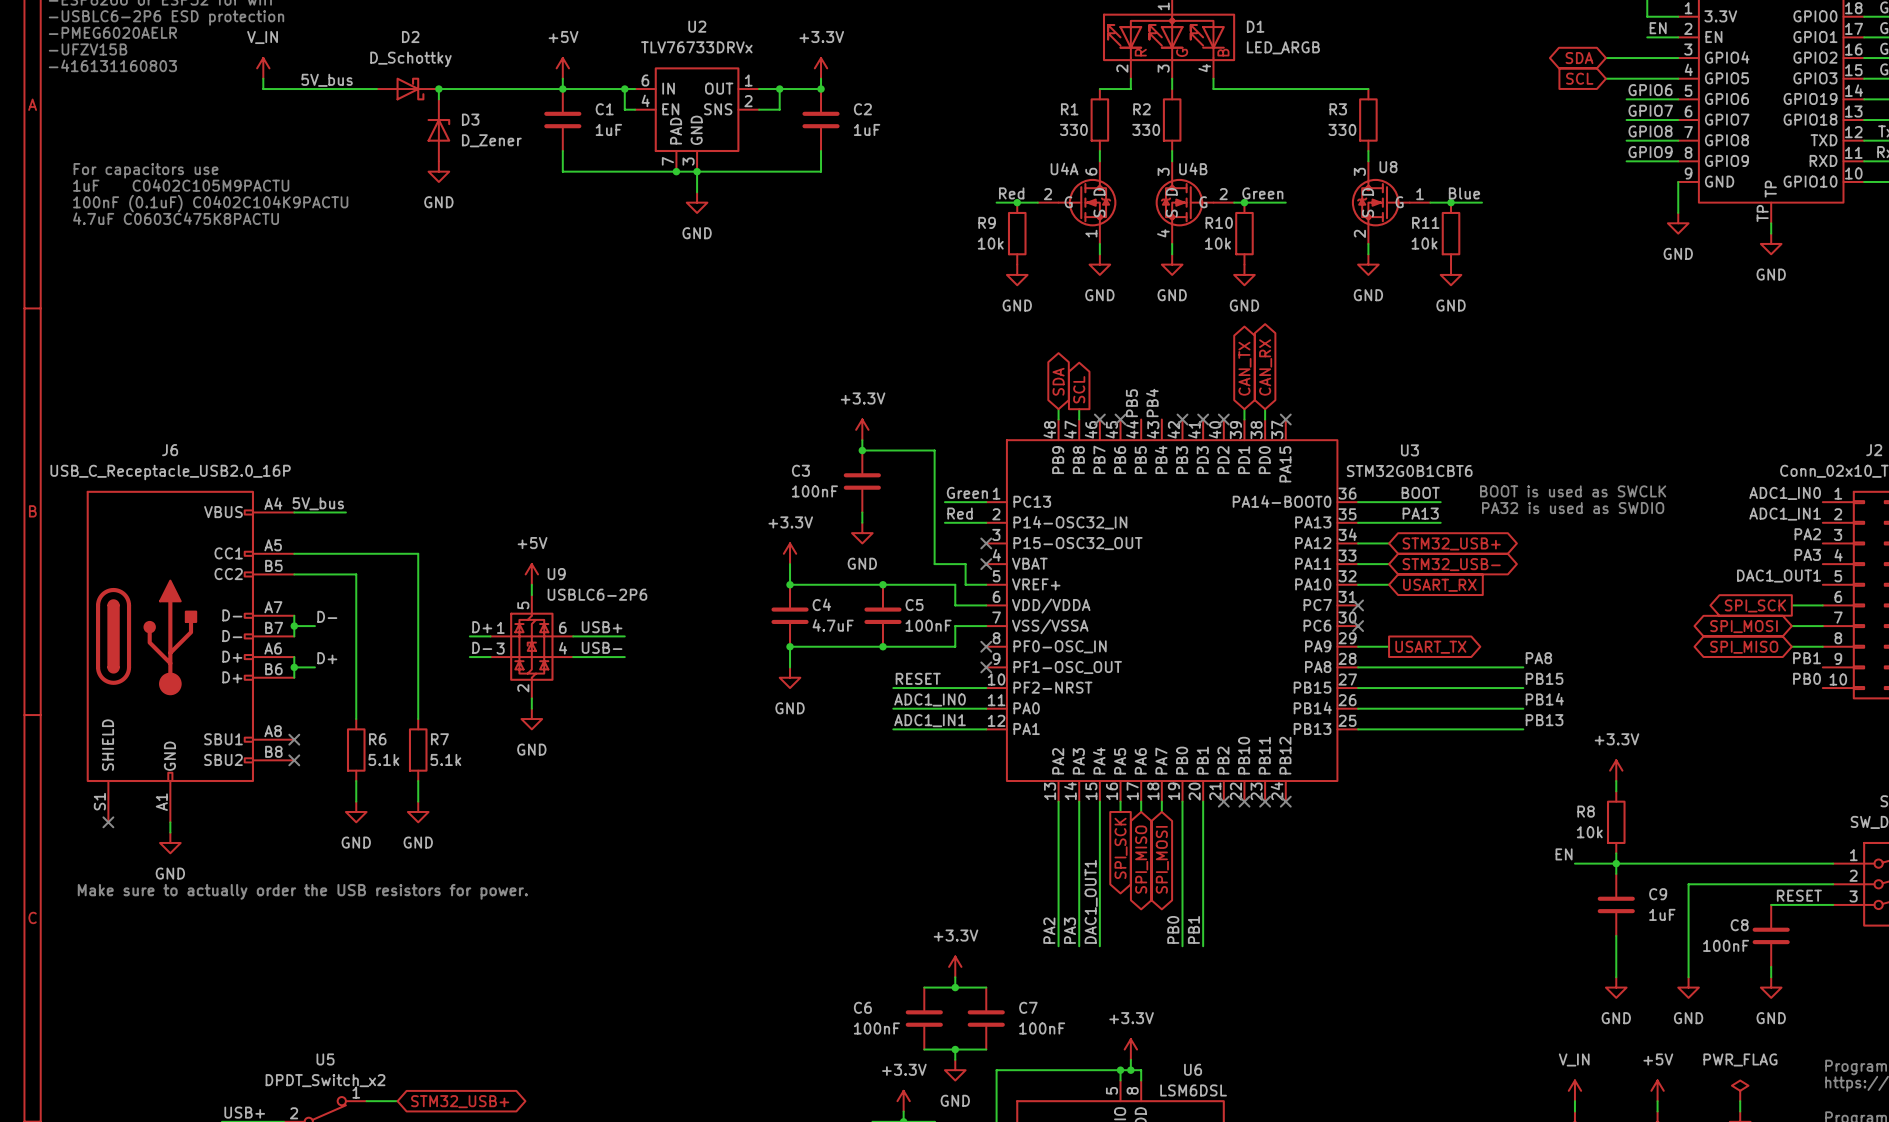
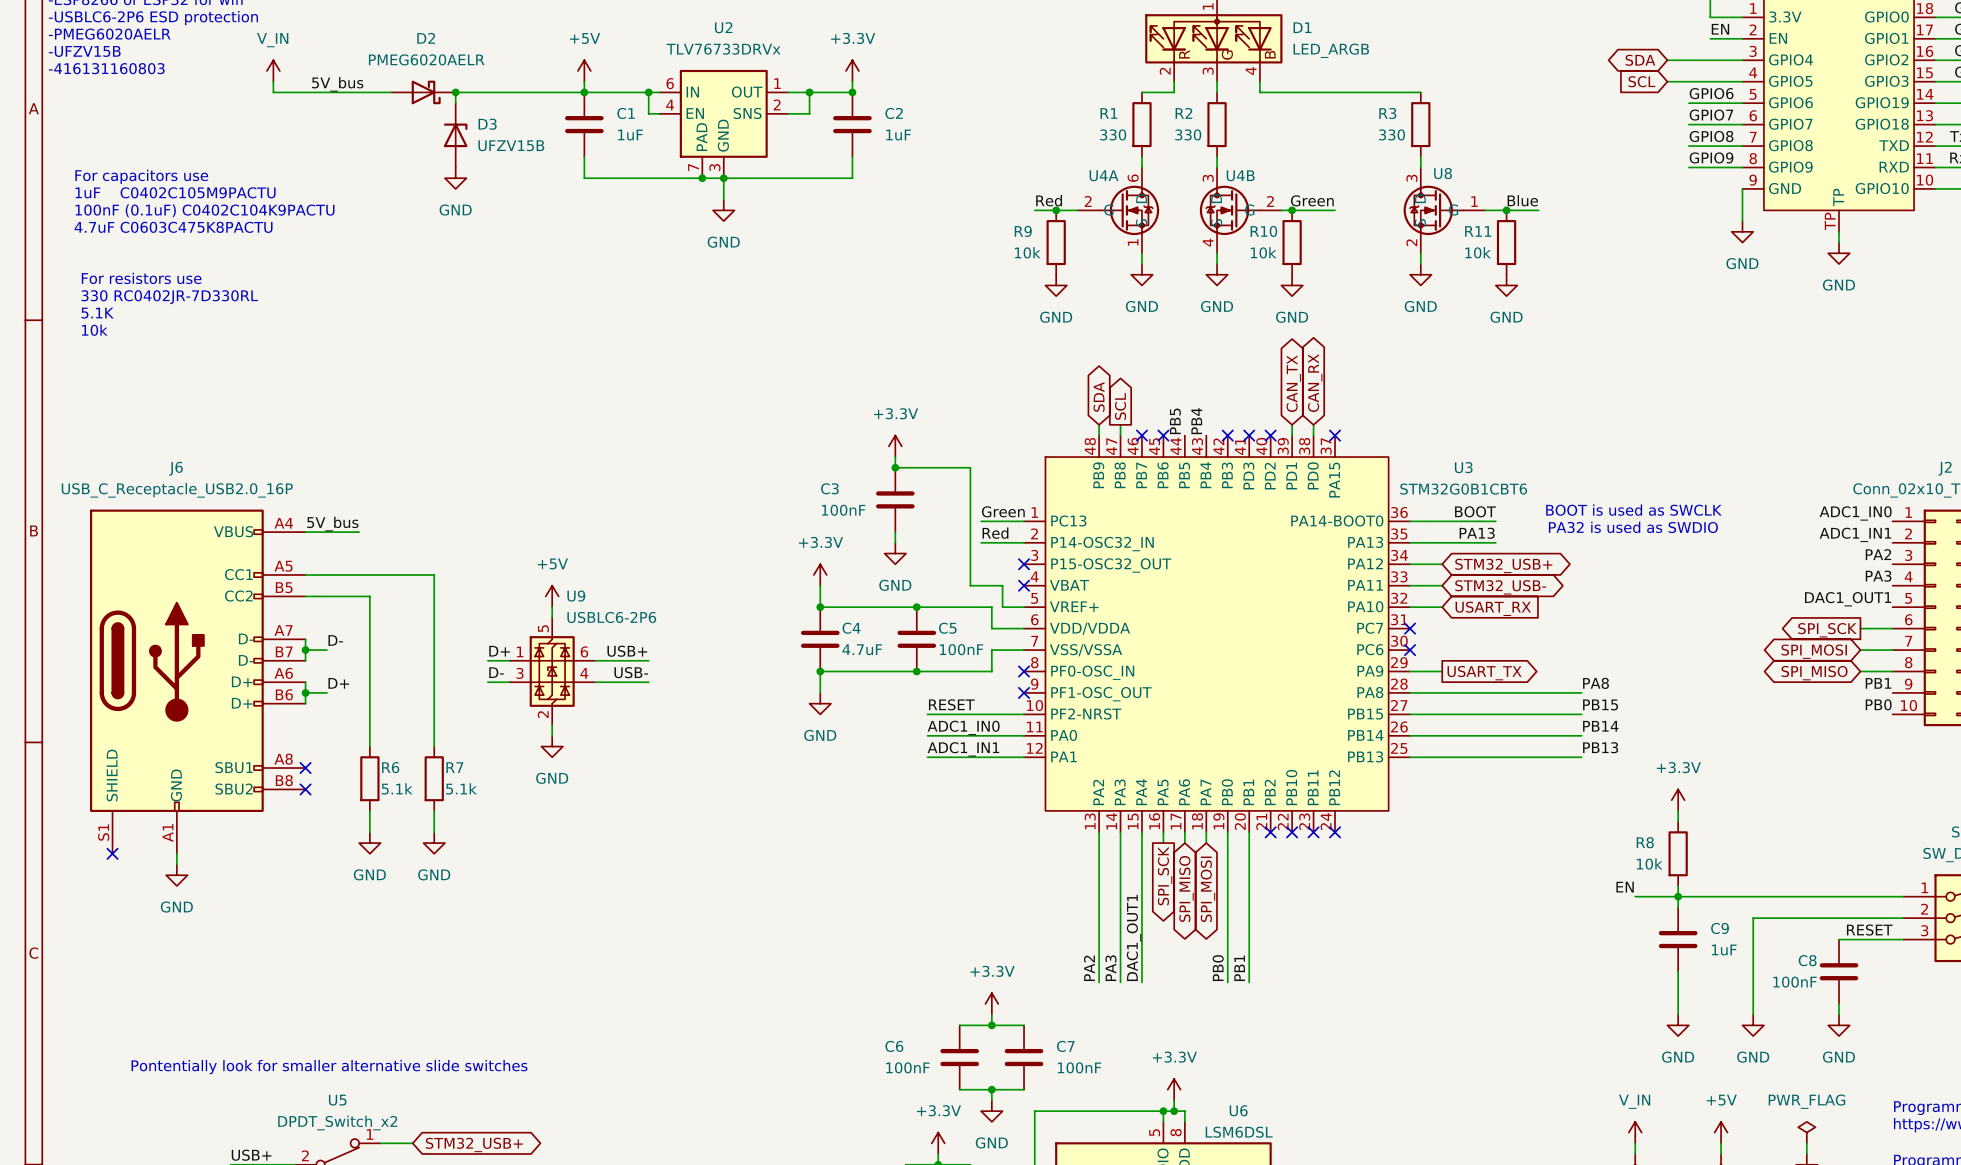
D2 value: D_Schottky (410, 59) -> PMEG6020AELR (426, 59)
D3 value: D_Zener (491, 140) -> UFZV15B (511, 145)
text: none -> For resistors use (141, 278)
text: none -> 330 RC0402JR-7D330RL (169, 297)
text: none -> 5.1K (97, 313)
text: none -> 10k (94, 330)
text: Make sure to actually order the USB resistors for power. (302, 891) -> none
text: none -> Pontentially look for smaller alternative slide switches (329, 1067)

